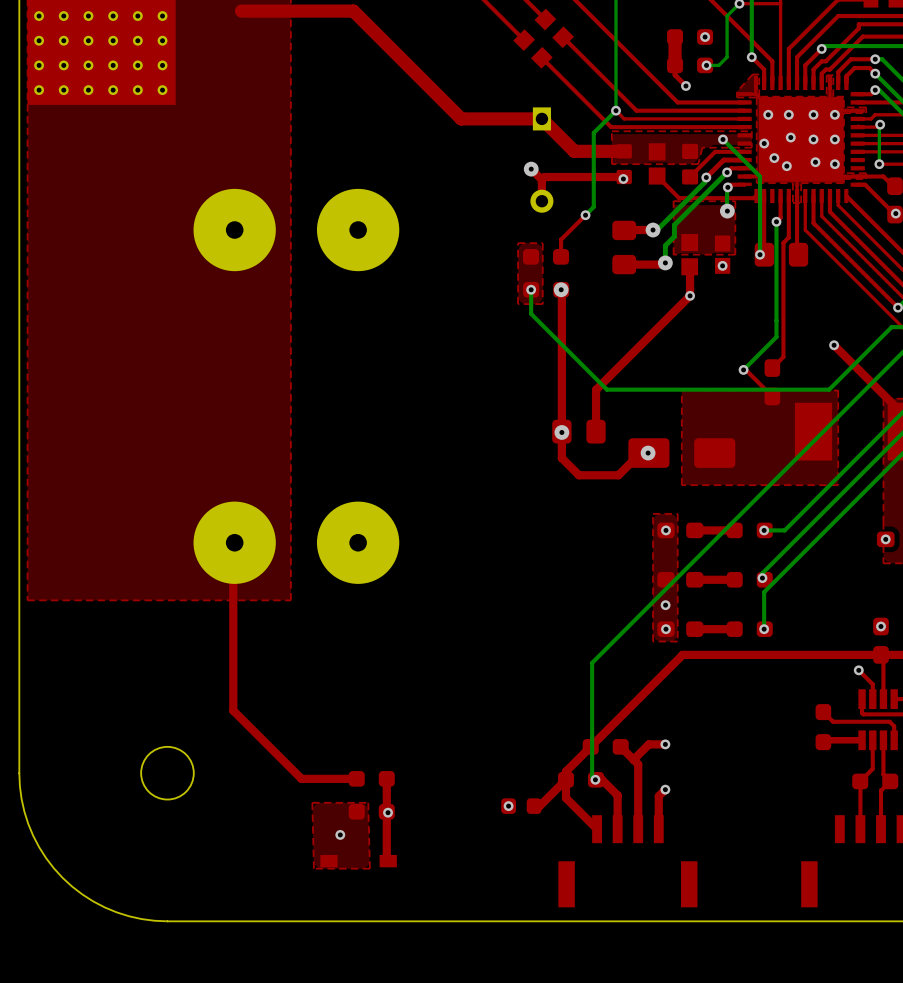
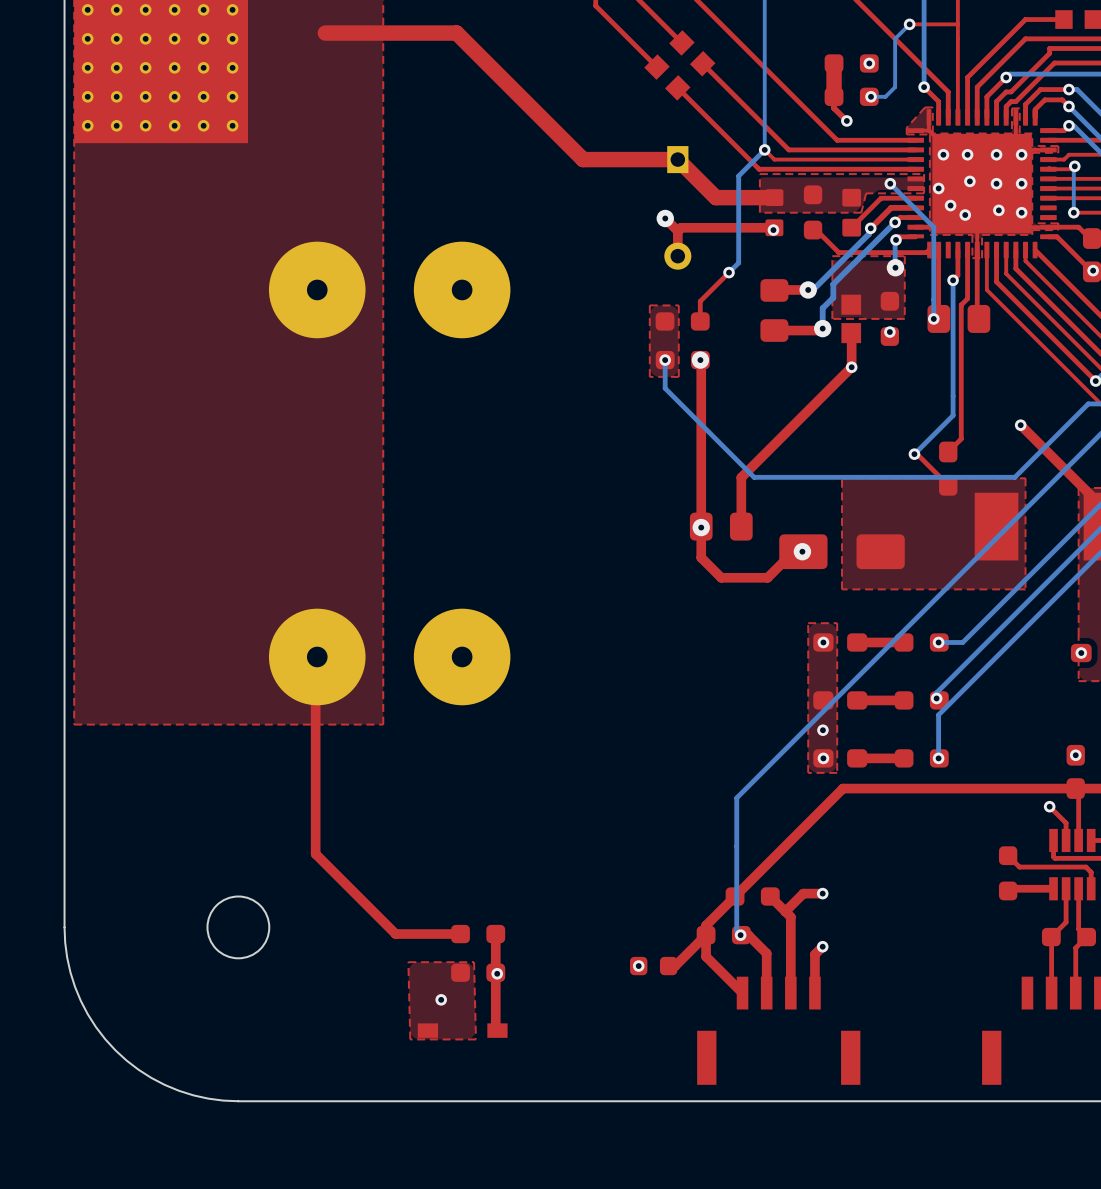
part footprint: [648, 143, 666, 185] -> [803, 185, 823, 240]
part footprint: [714, 235, 731, 274] -> [880, 291, 900, 346]

